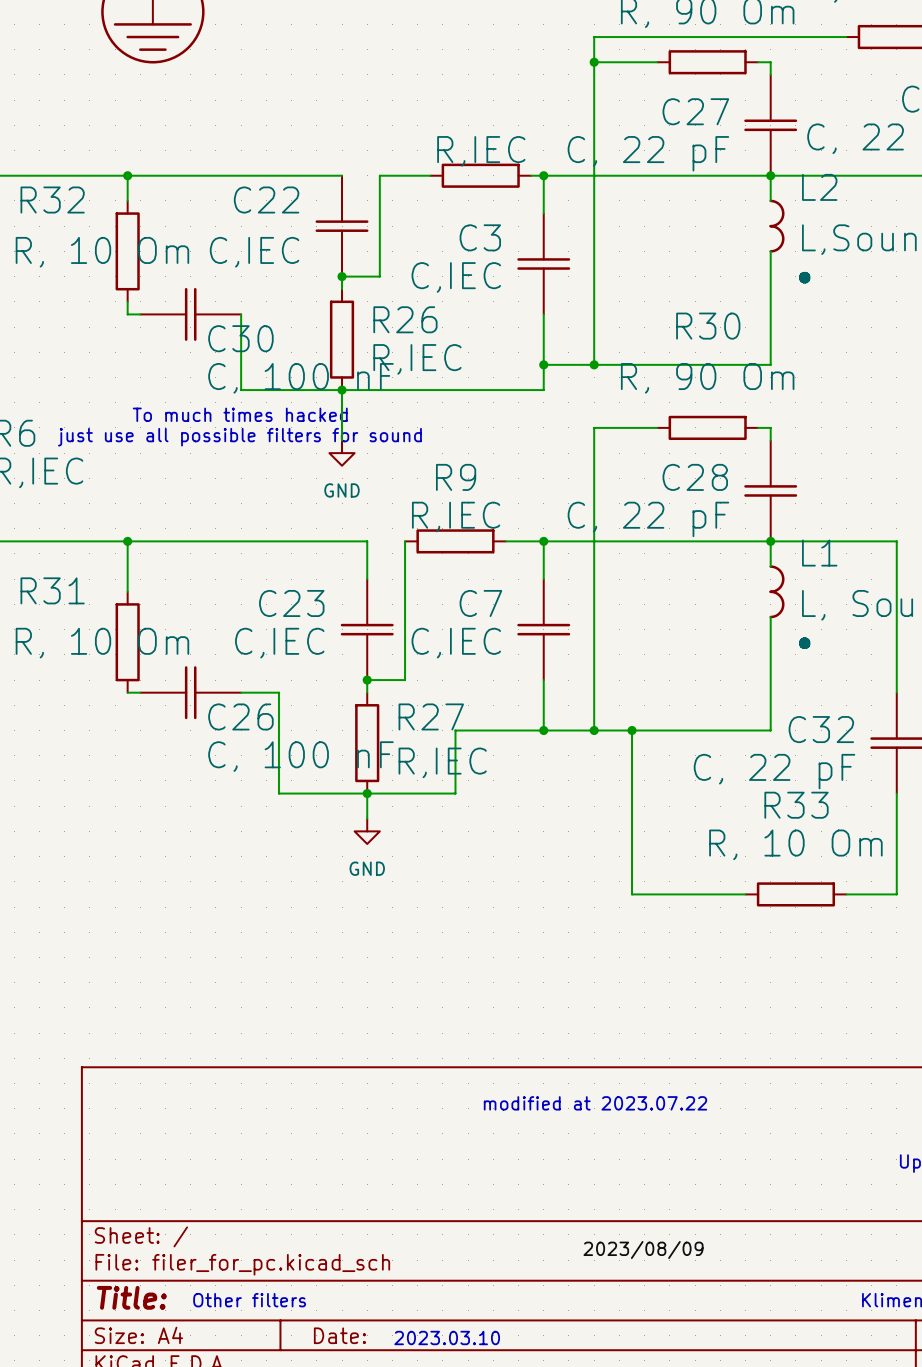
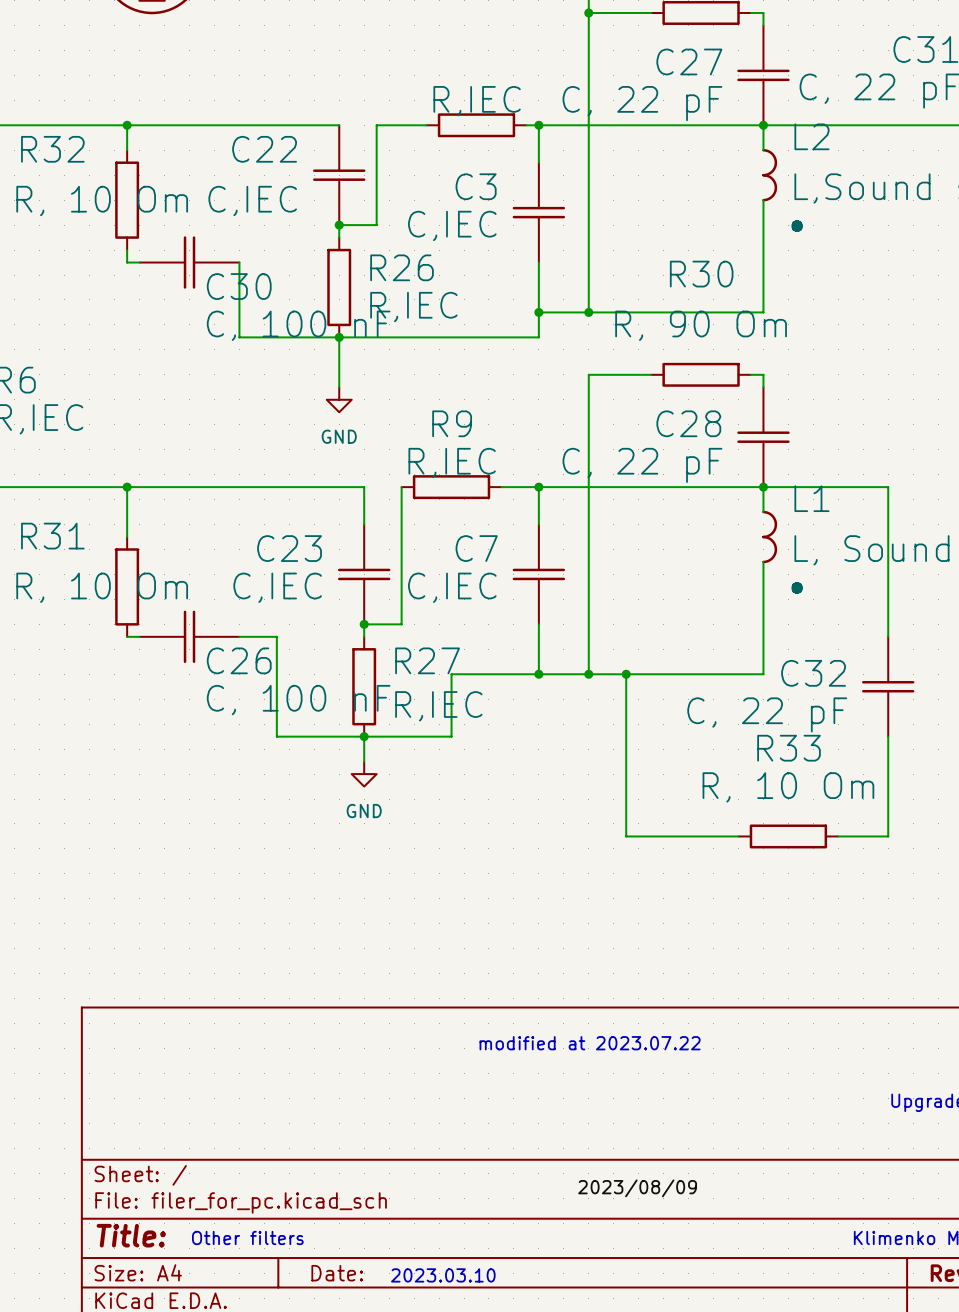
text: To much times hacked (240, 414) -> none
text: just use all possible filters for sound (239, 437) -> none

